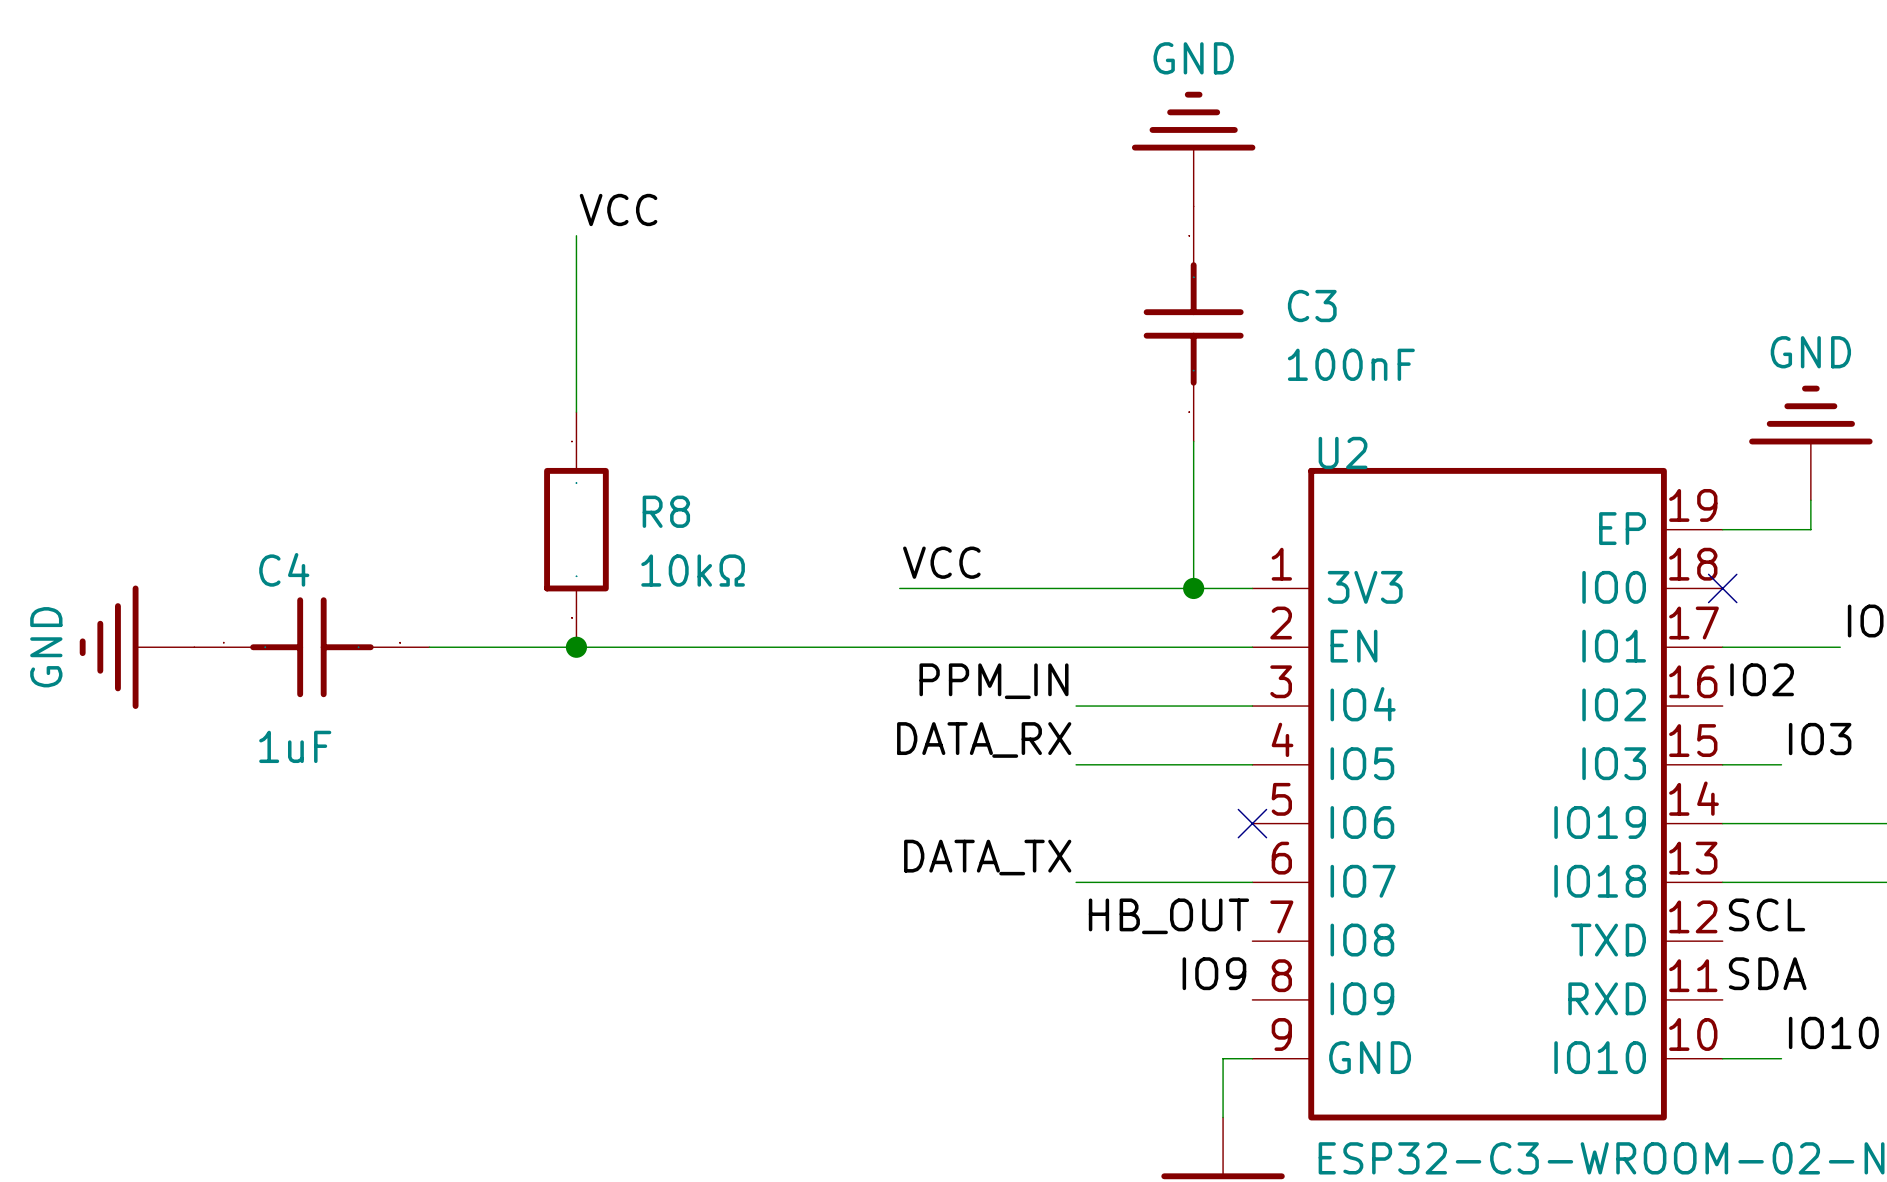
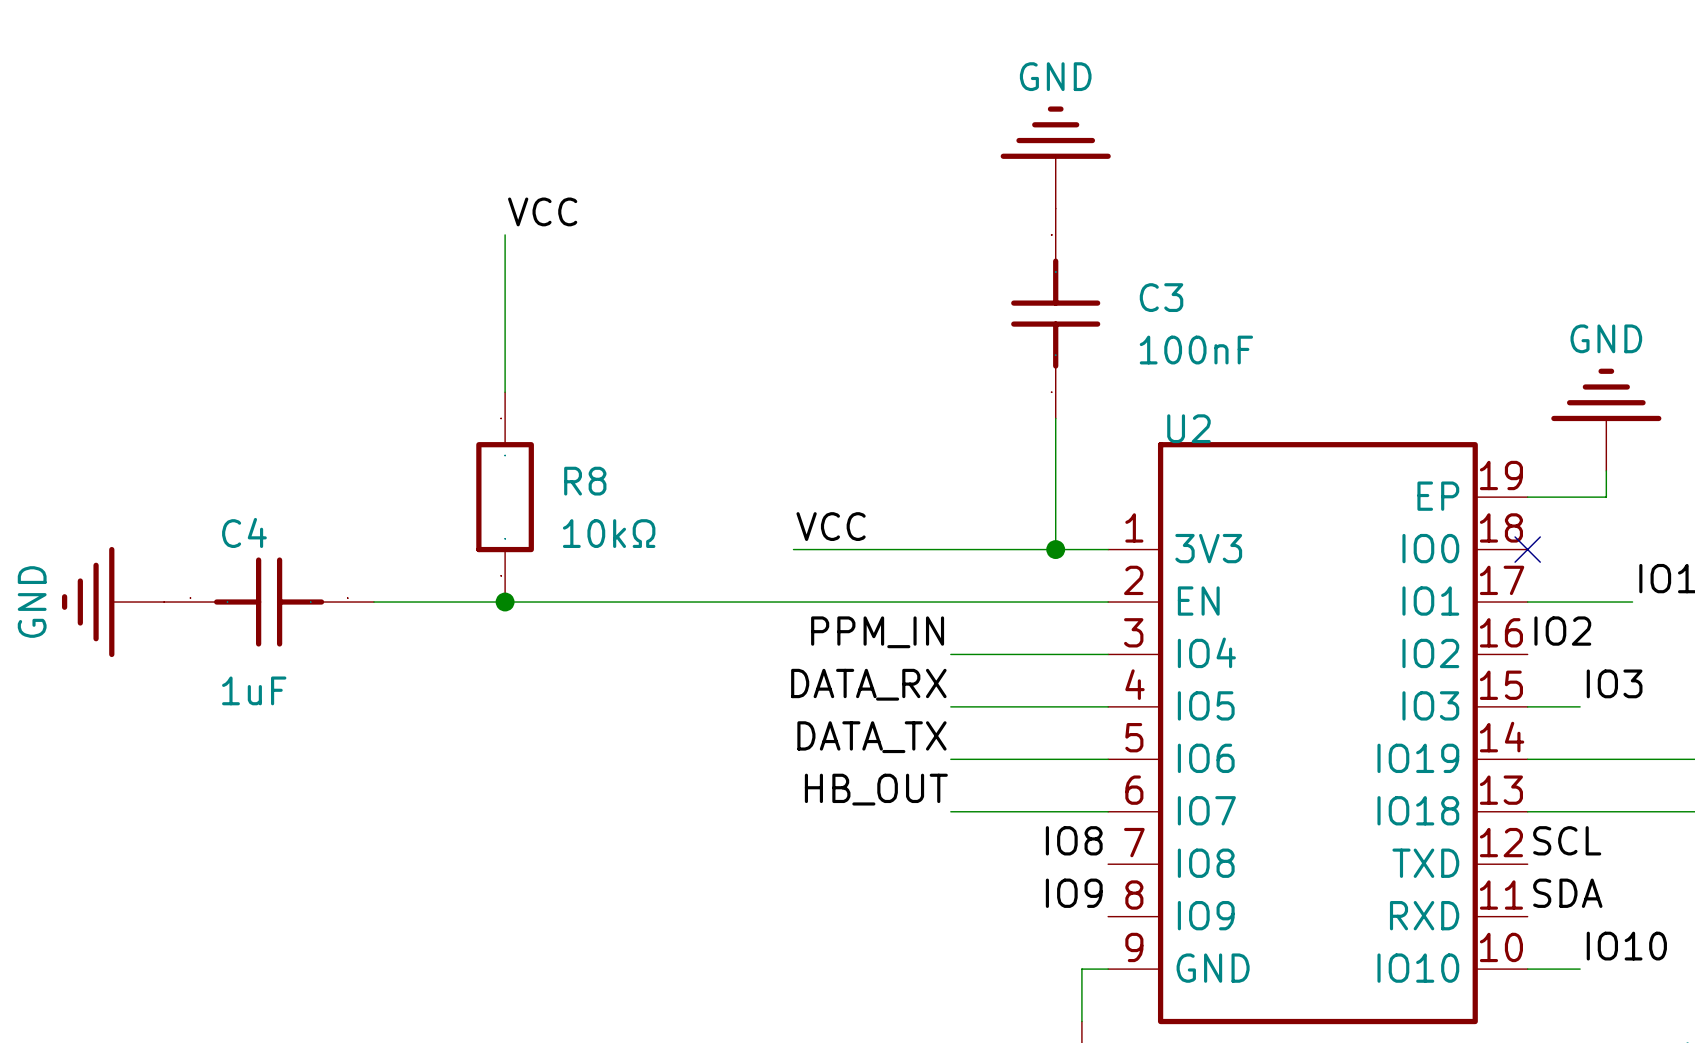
label: none -> DATA_TX (871, 737)
wire: none -> (950, 759) (1108, 759)
no-connect mark: (1252, 823) -> none
label: DATA_TX (987, 857) -> HB_OUT (876, 789)
label: HB_OUT (1168, 916) -> IO8 (1074, 840)

